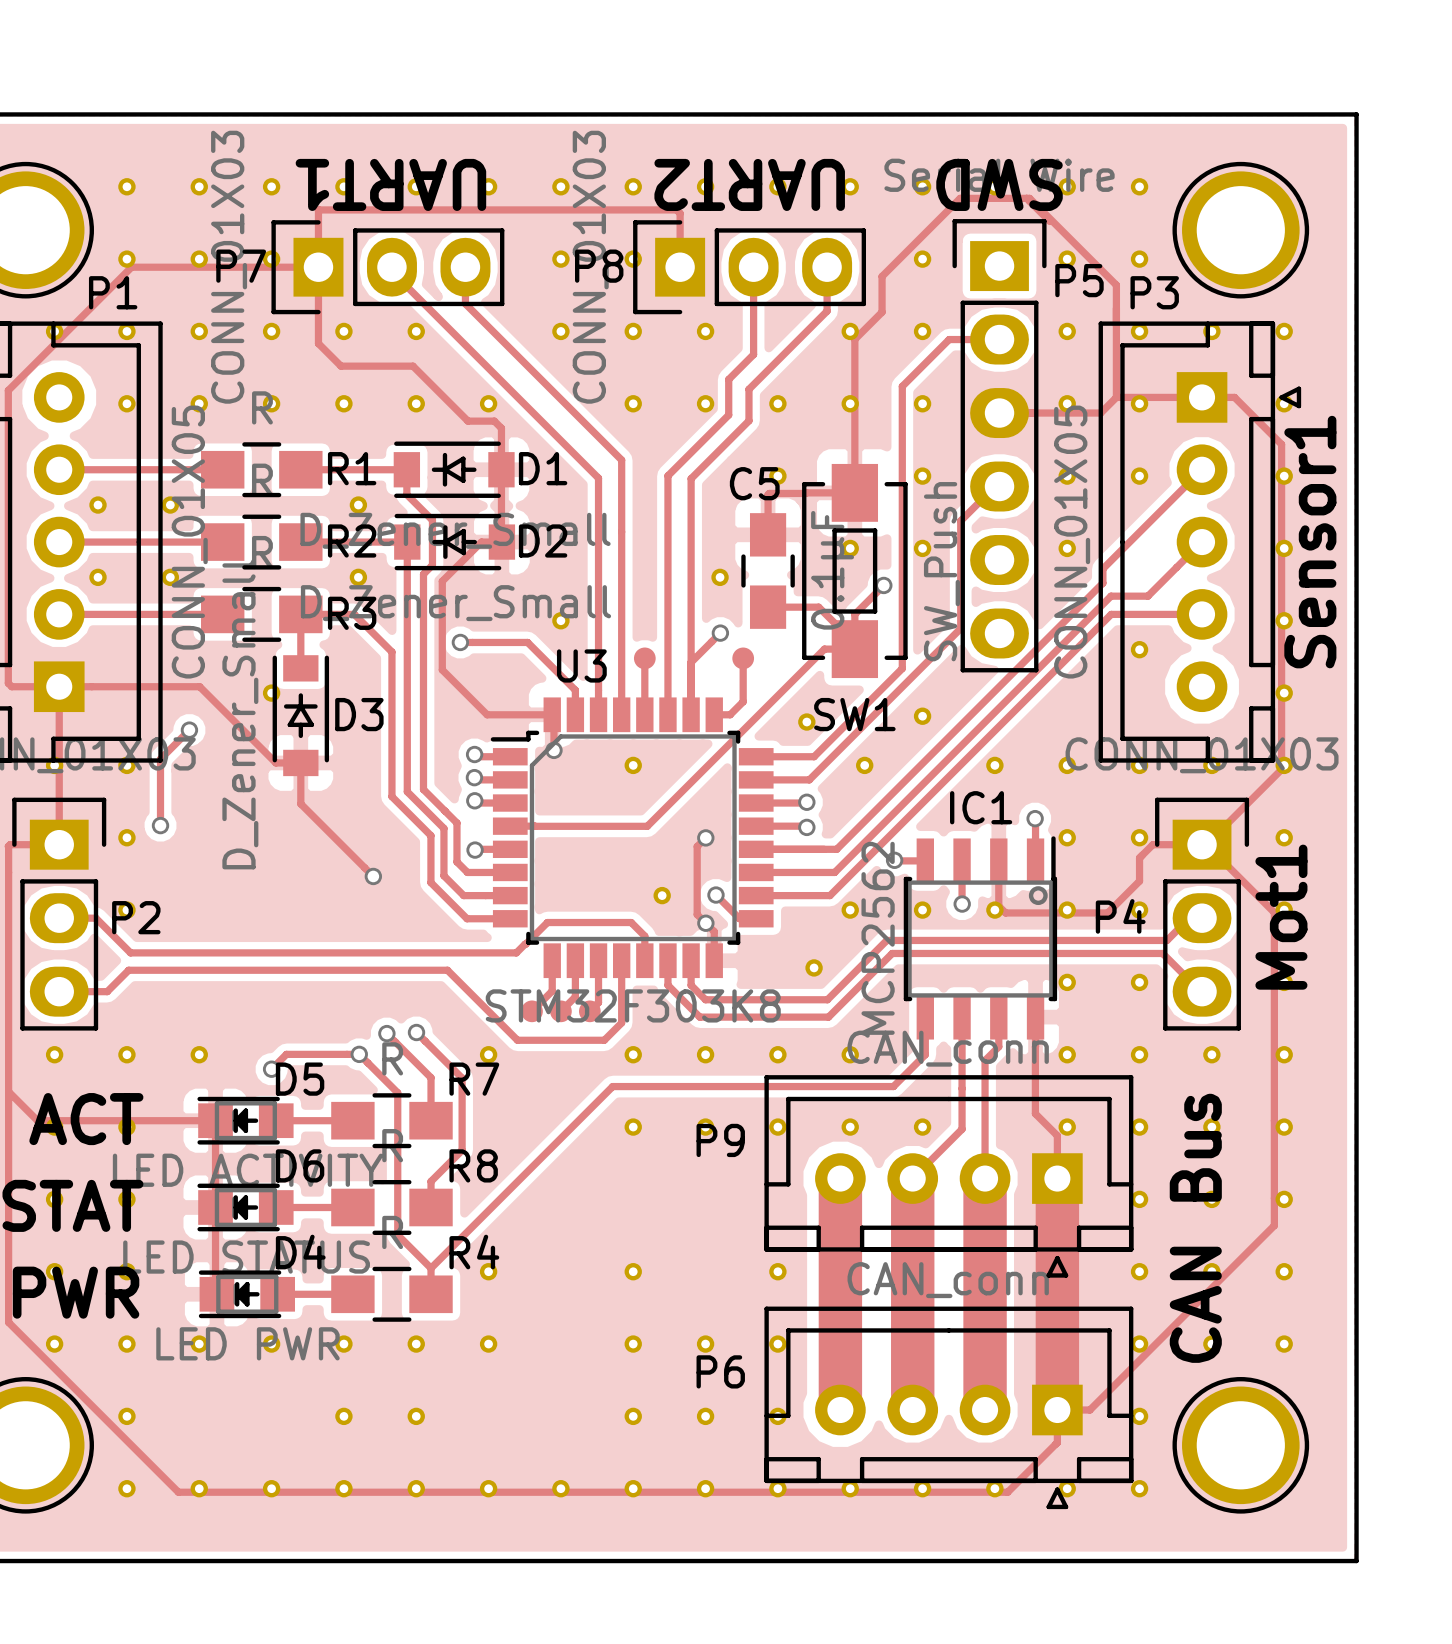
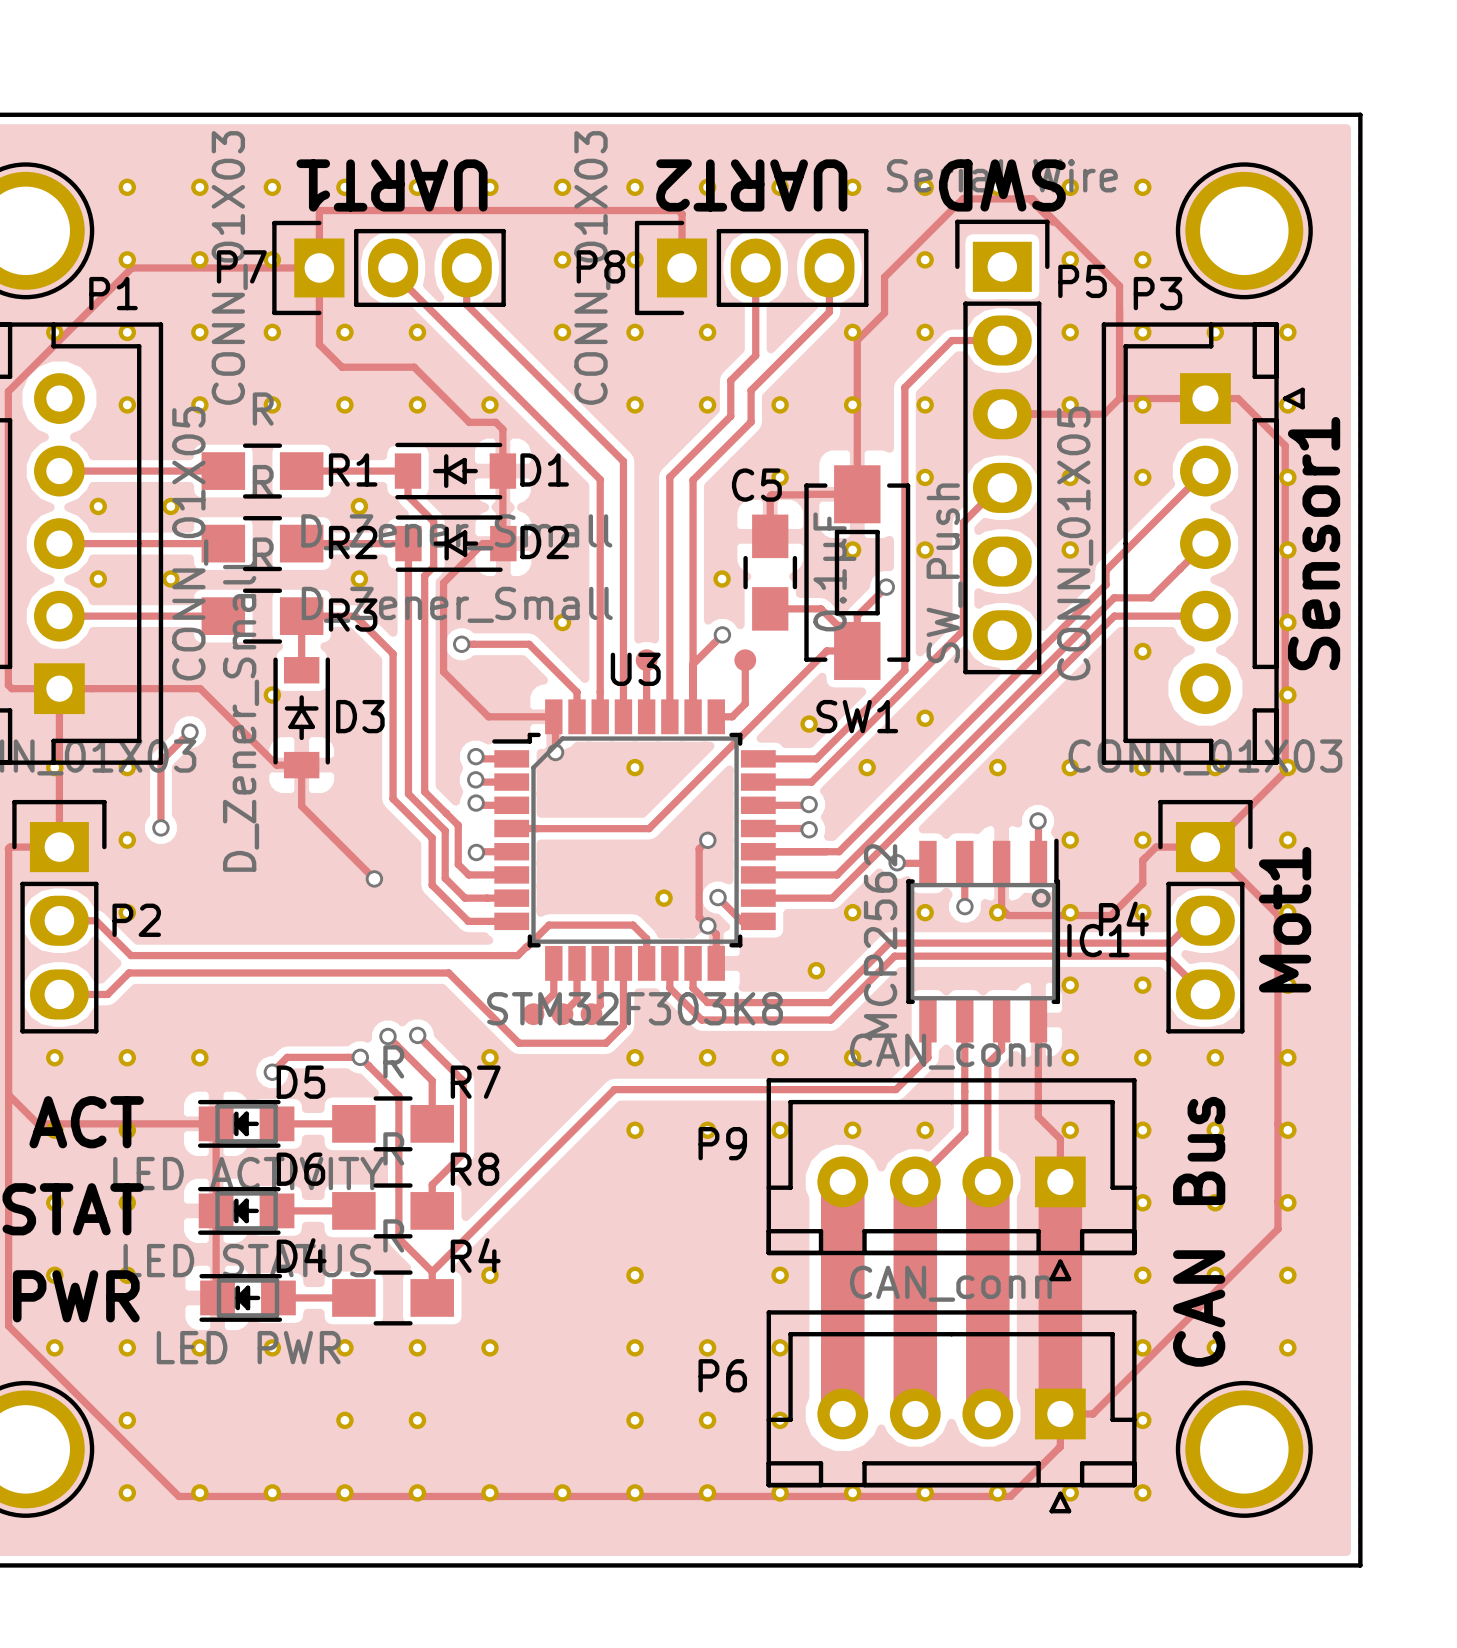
U3 name position: U3 (581, 665) -> U3 (635, 669)
IC1 name position: IC1 (981, 807) -> IC1 (1098, 940)

